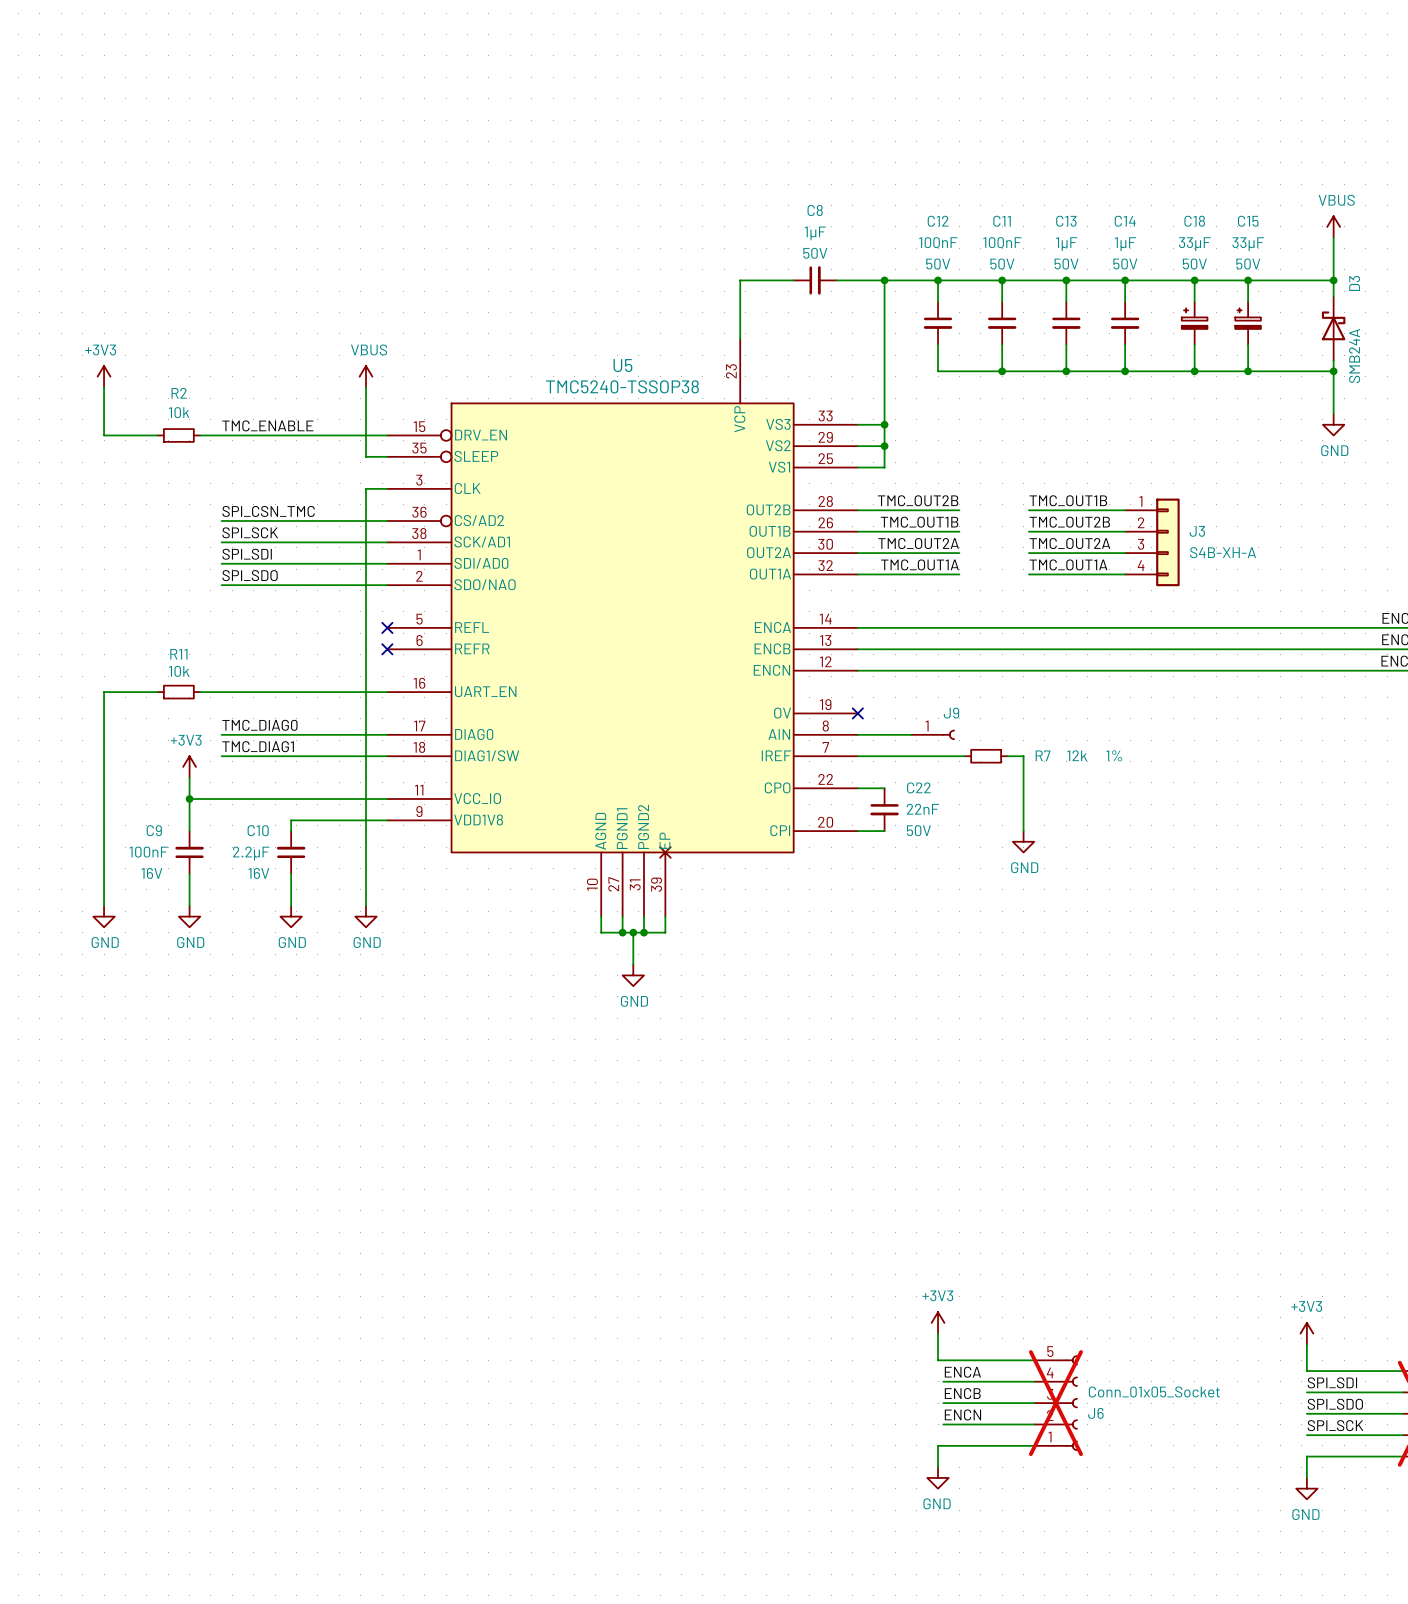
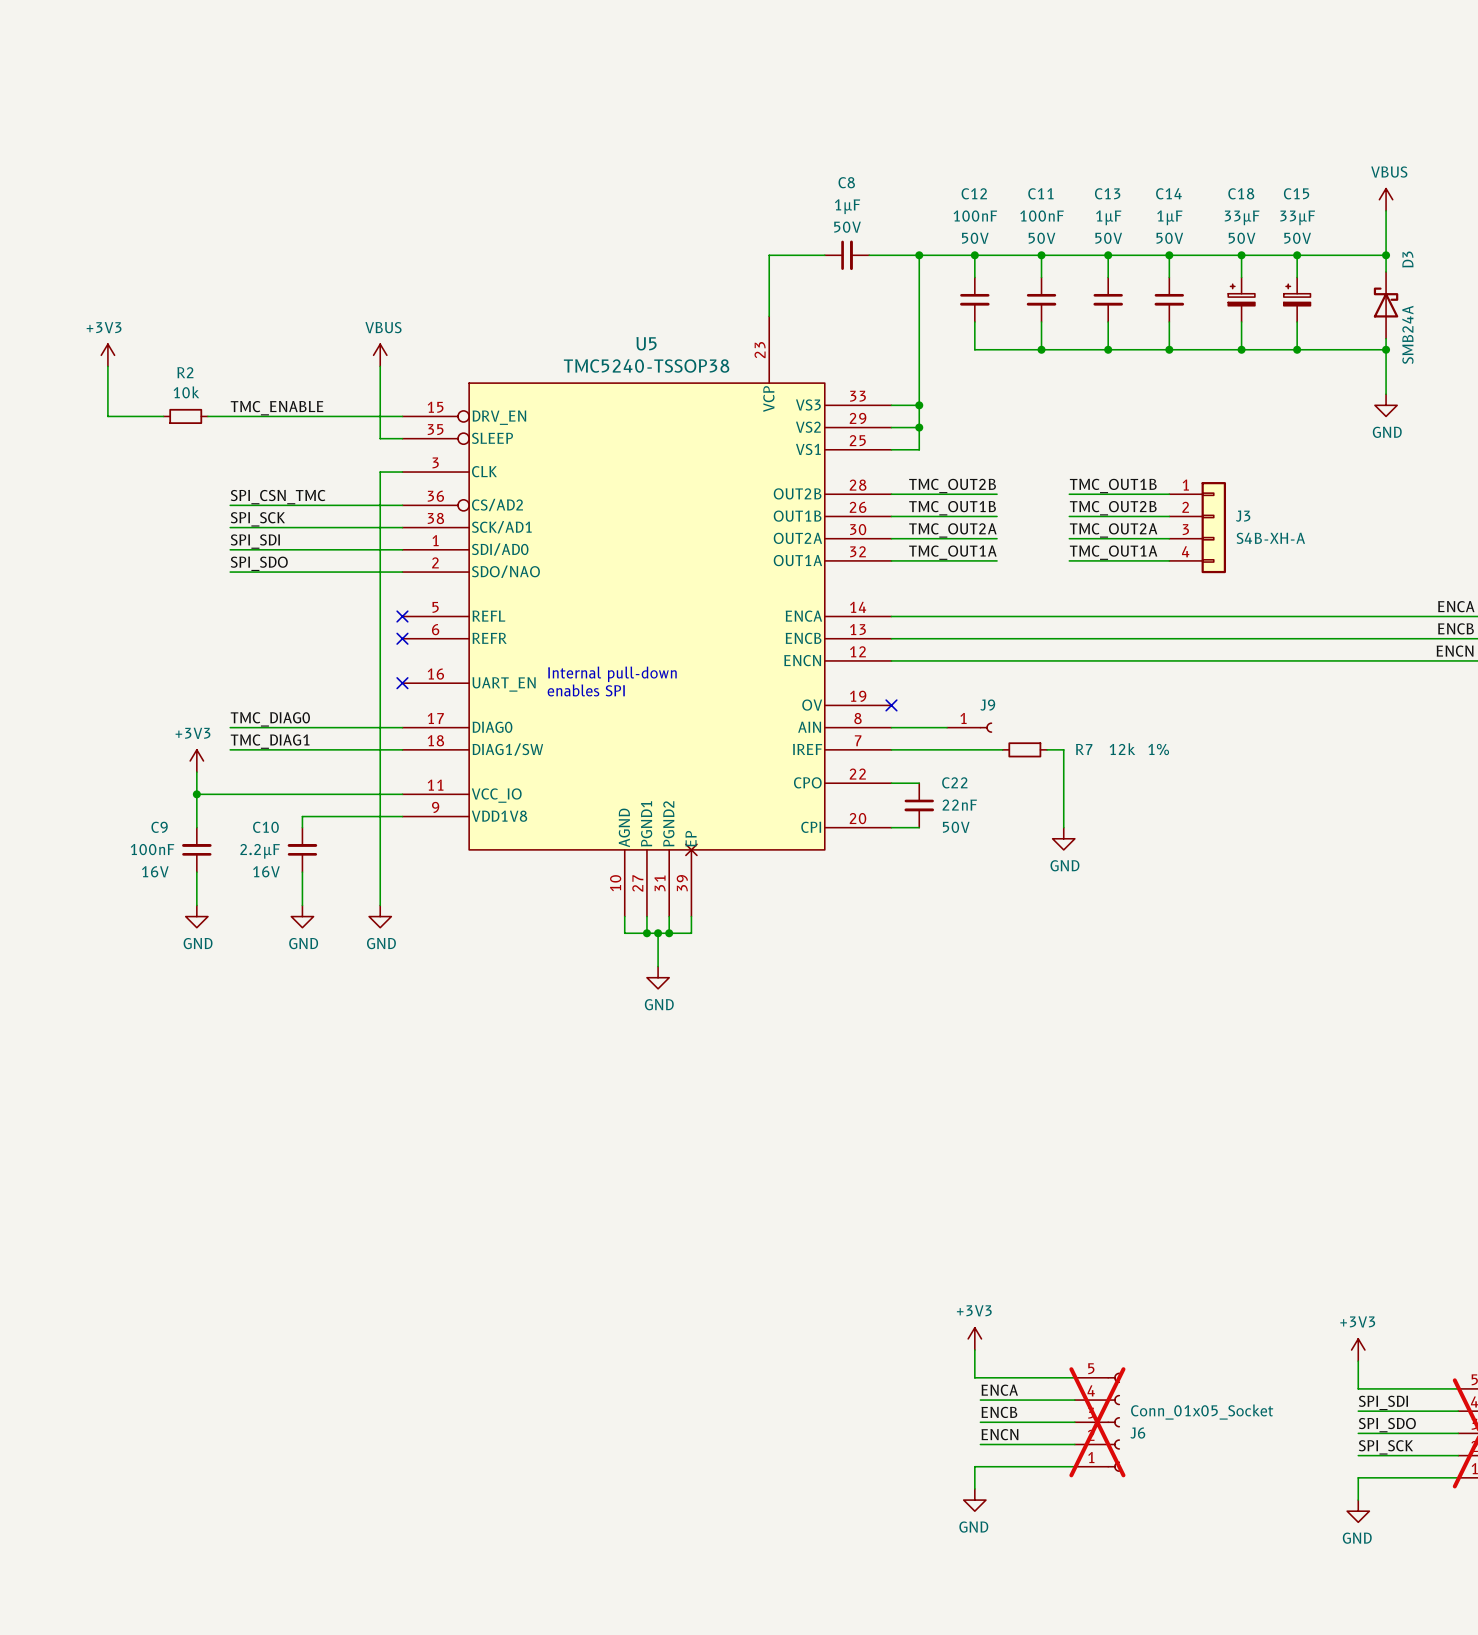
text: none -> Internal pull-down (612, 674)
wire: (157, 692) (104, 692) (104, 905) -> none
R11: 10k (178, 692) -> none
wire: (200, 692) (387, 692) -> none
no-connect mark: none -> (402, 683)
text: none -> enables SPI (586, 690)
power symbol: GND (104, 916) -> none

